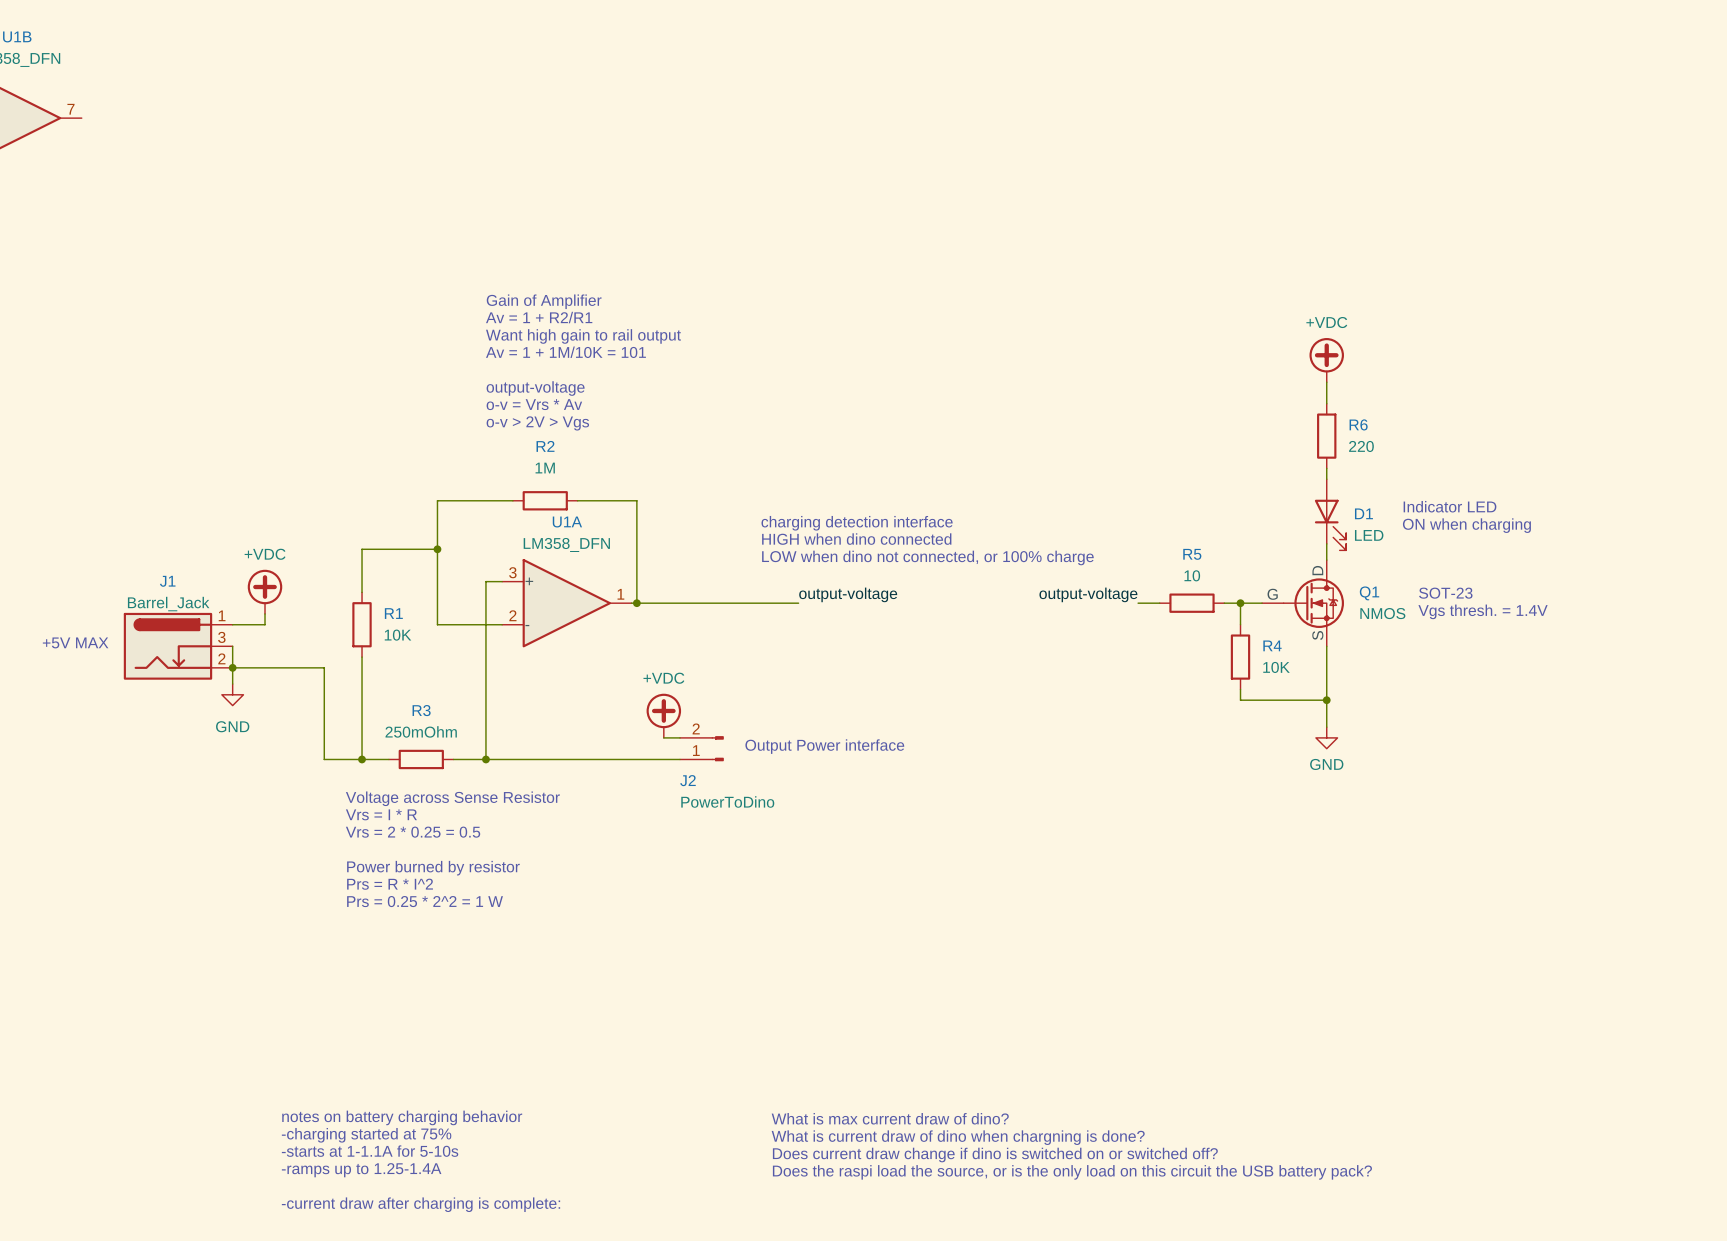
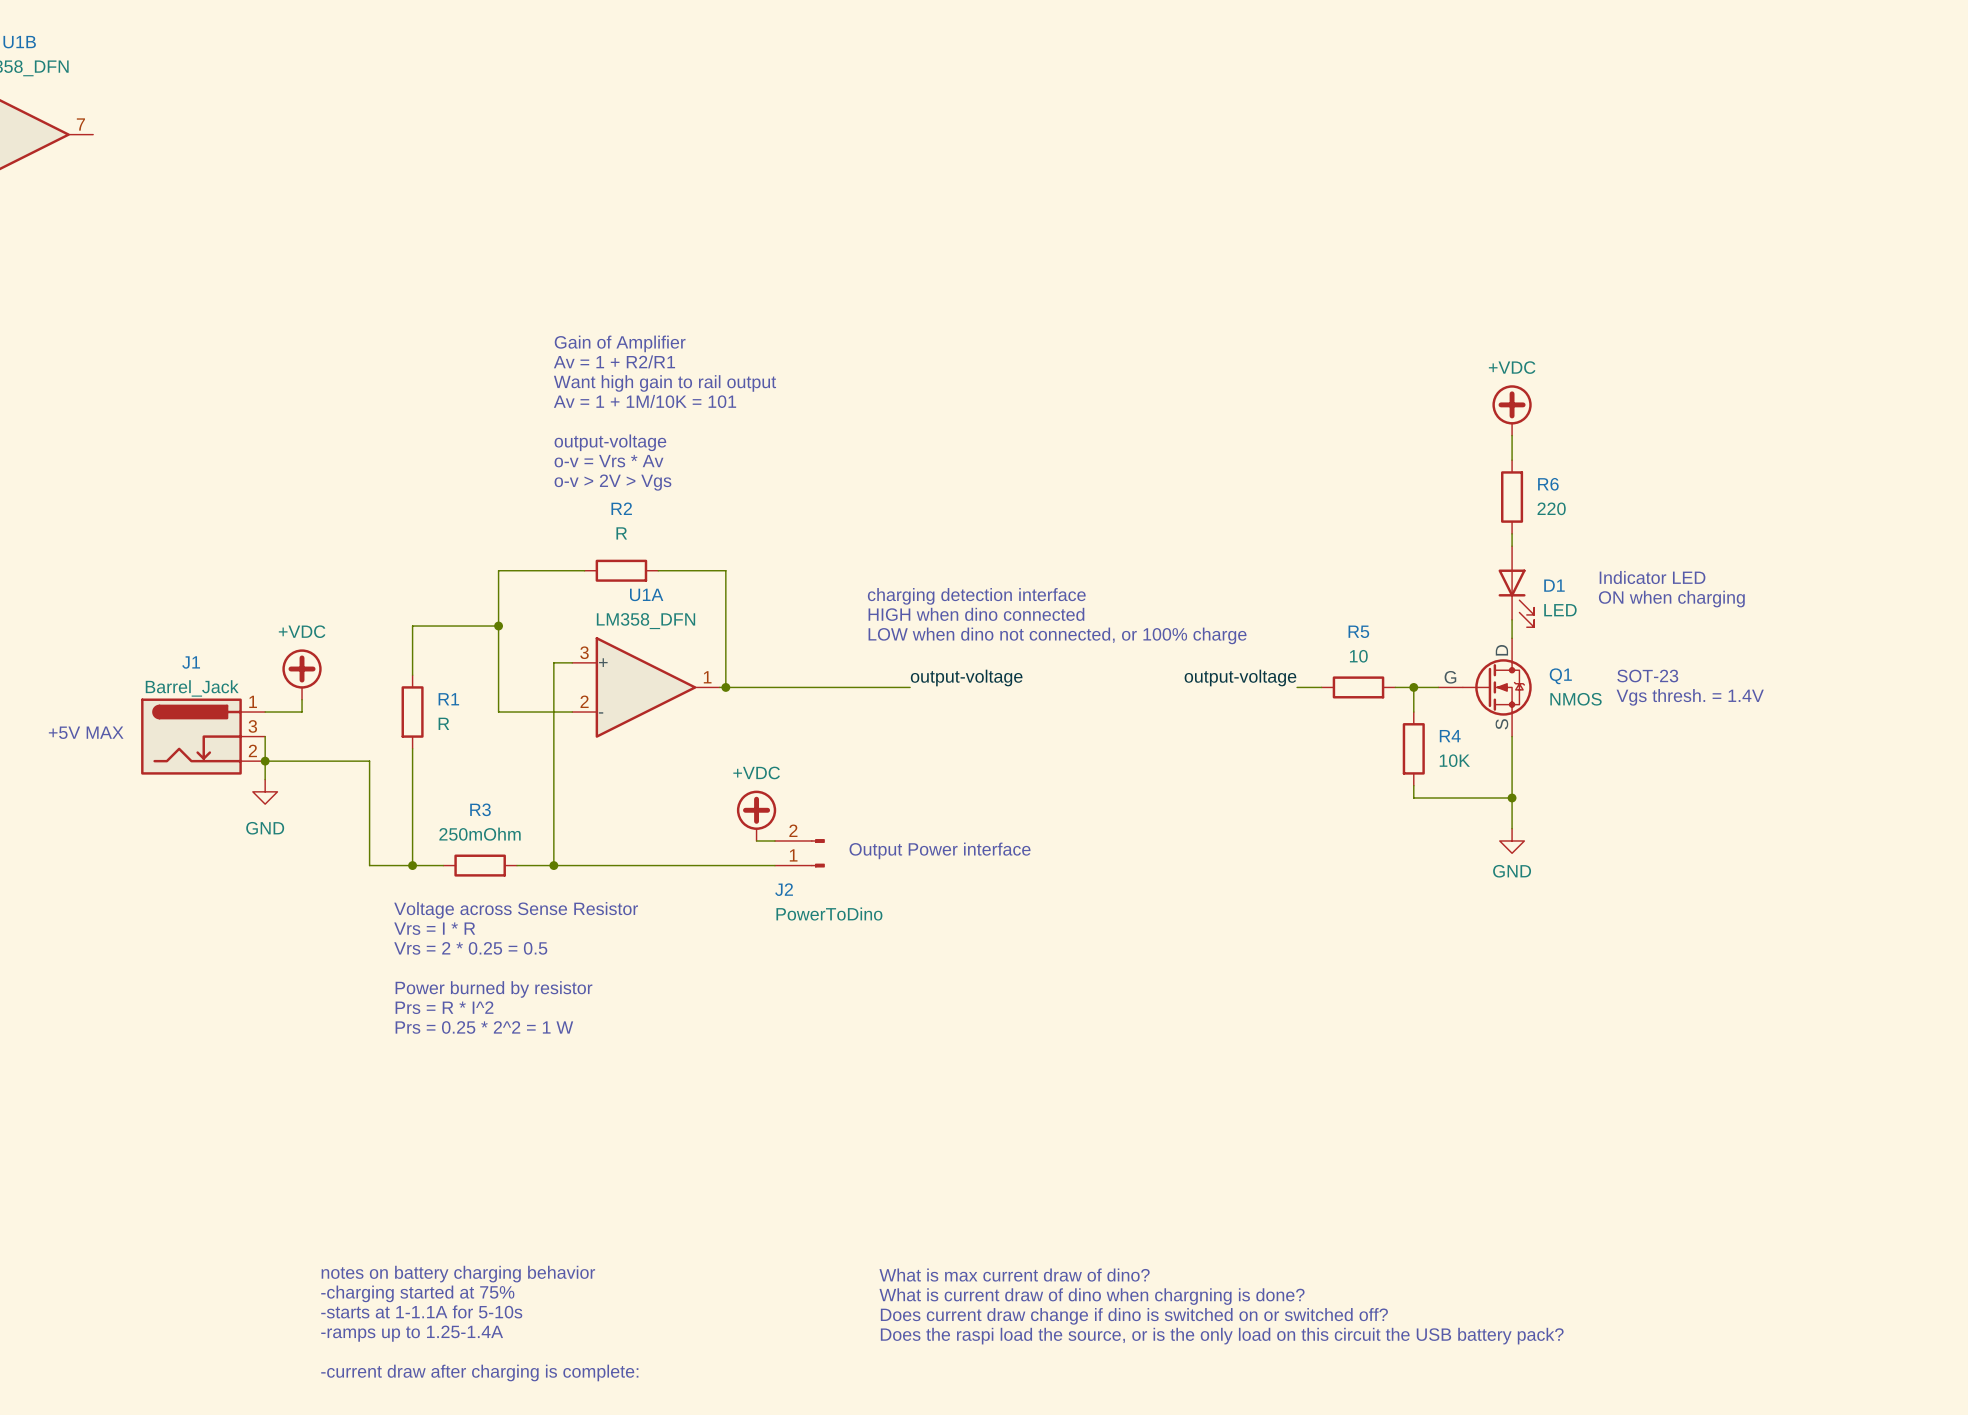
R2 value: 1M (545, 468) -> R (621, 533)
R1 value: 10K (398, 635) -> R (443, 723)

